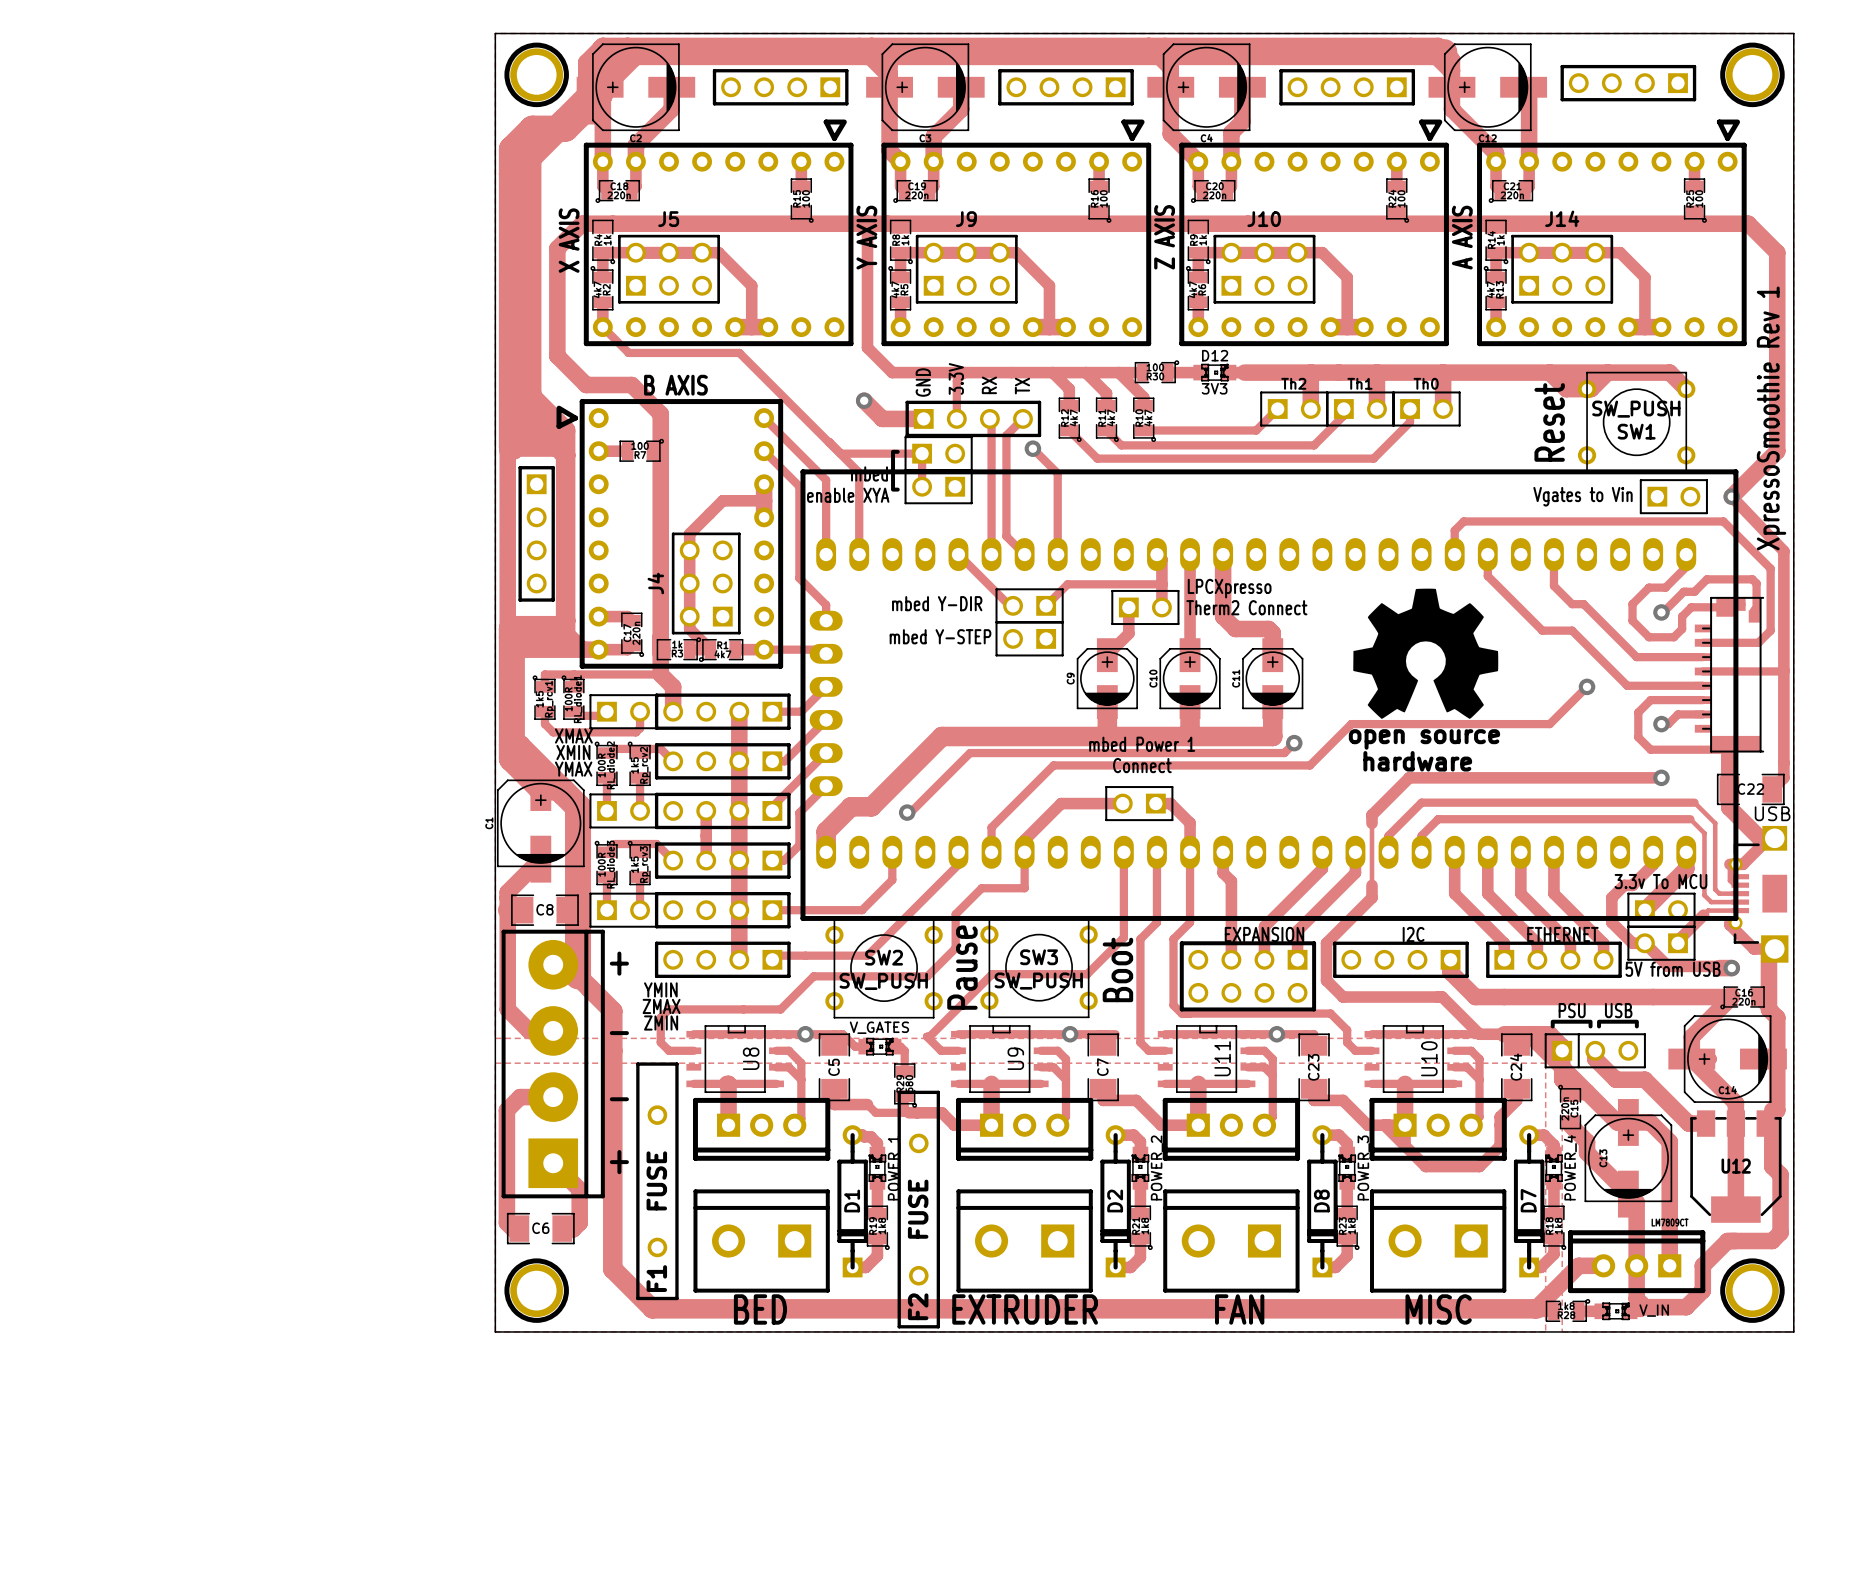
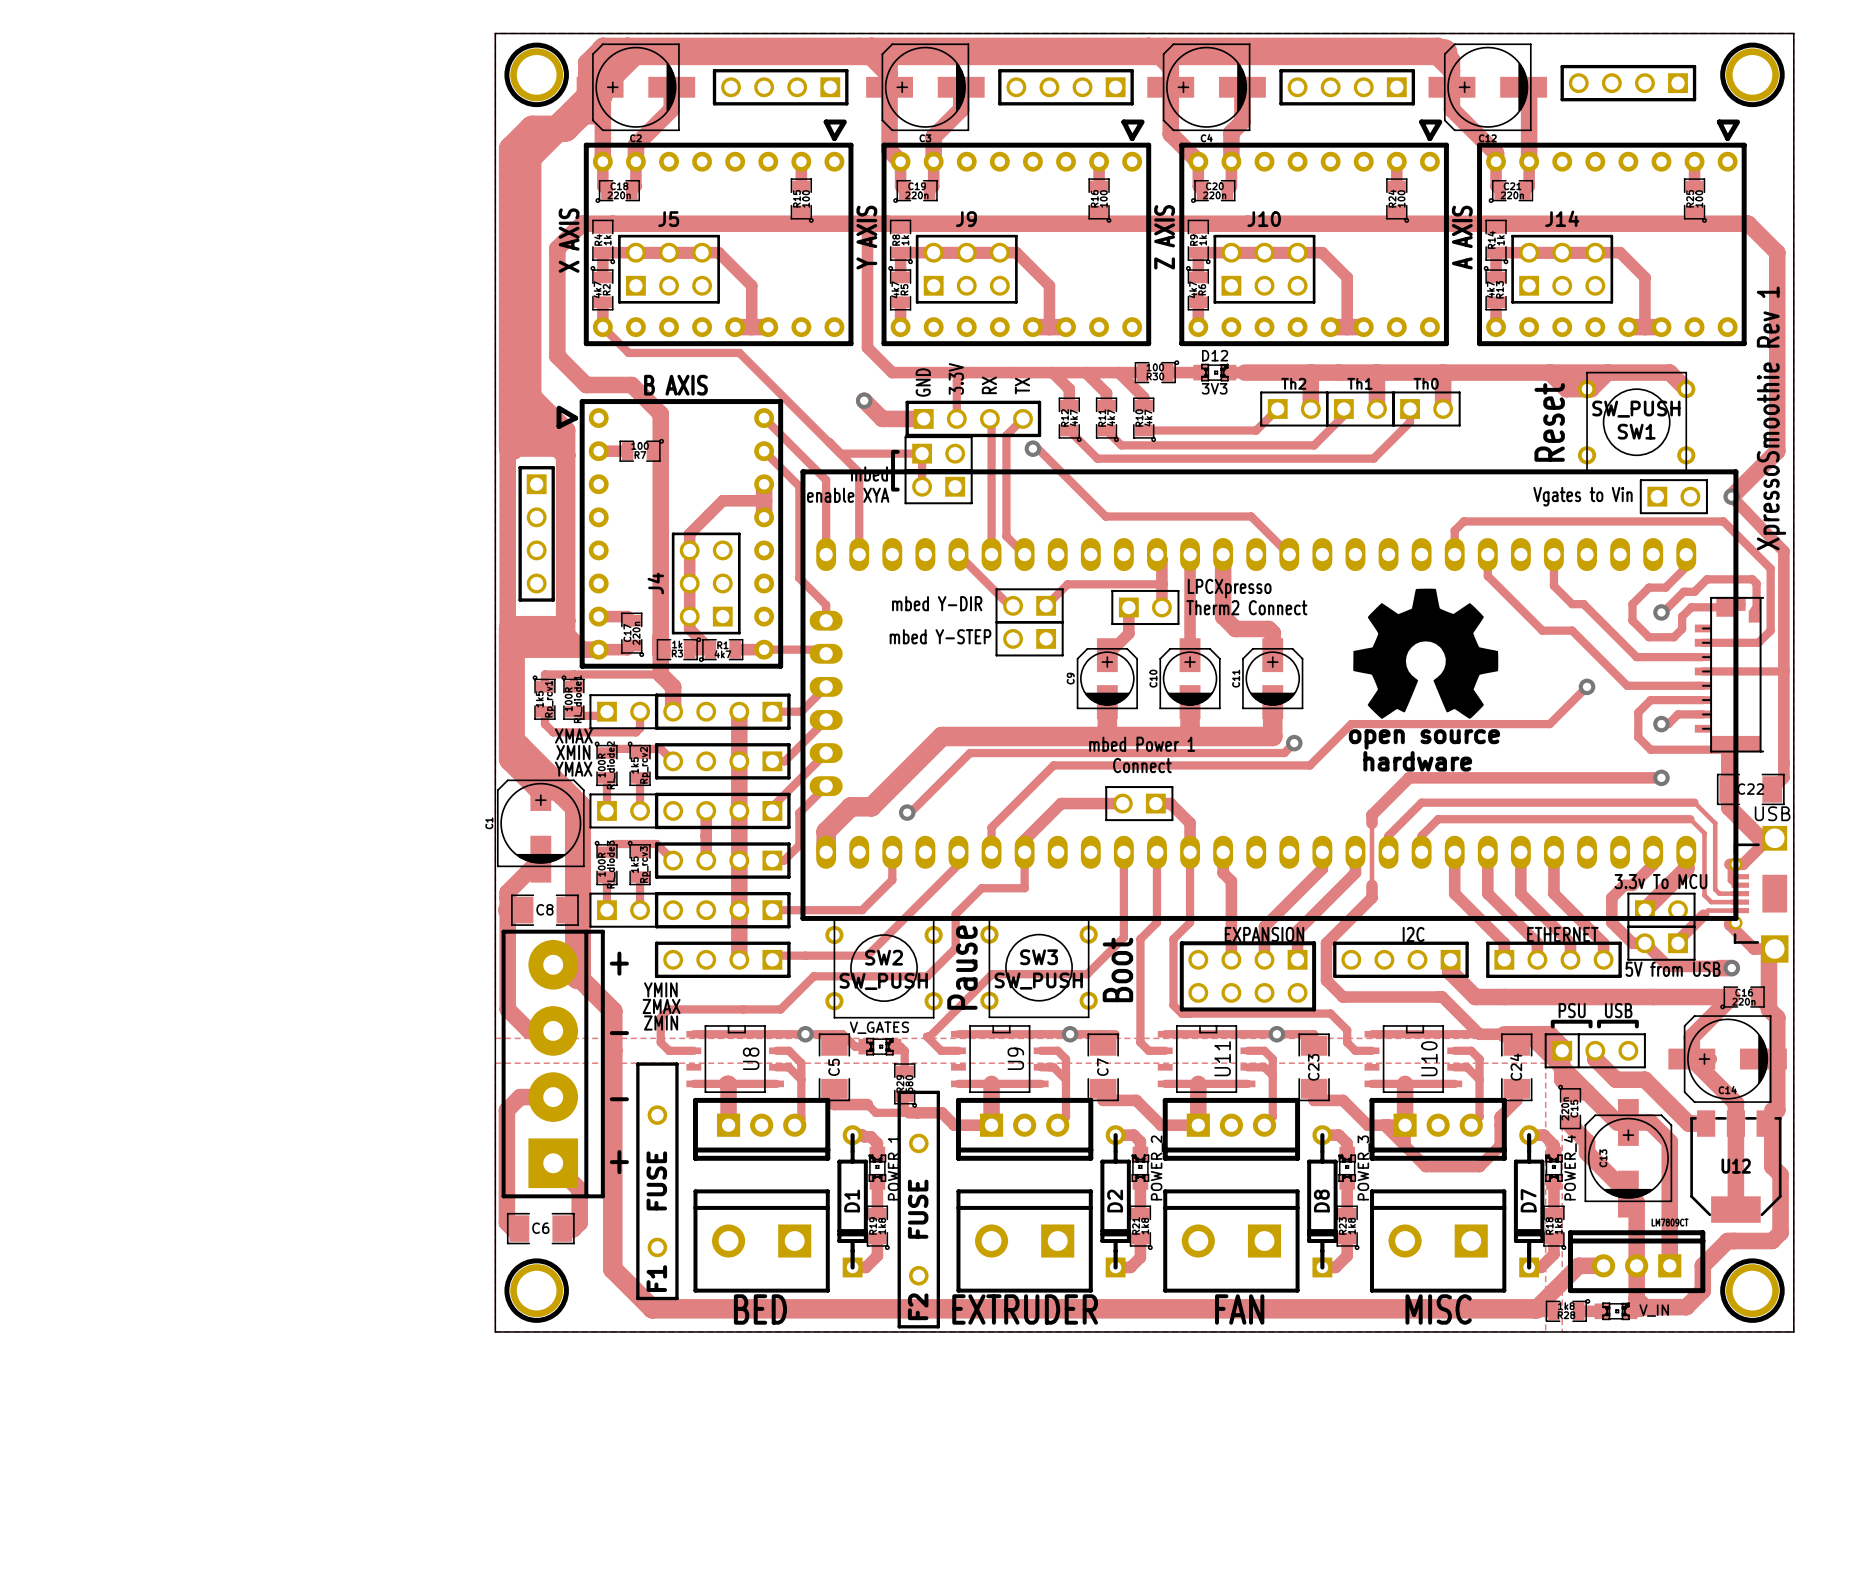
track: (1032, 448) (1057, 473) (1057, 554) -> none
track: none -> (1037, 448) (1105, 516) (1251, 516) (1289, 554)

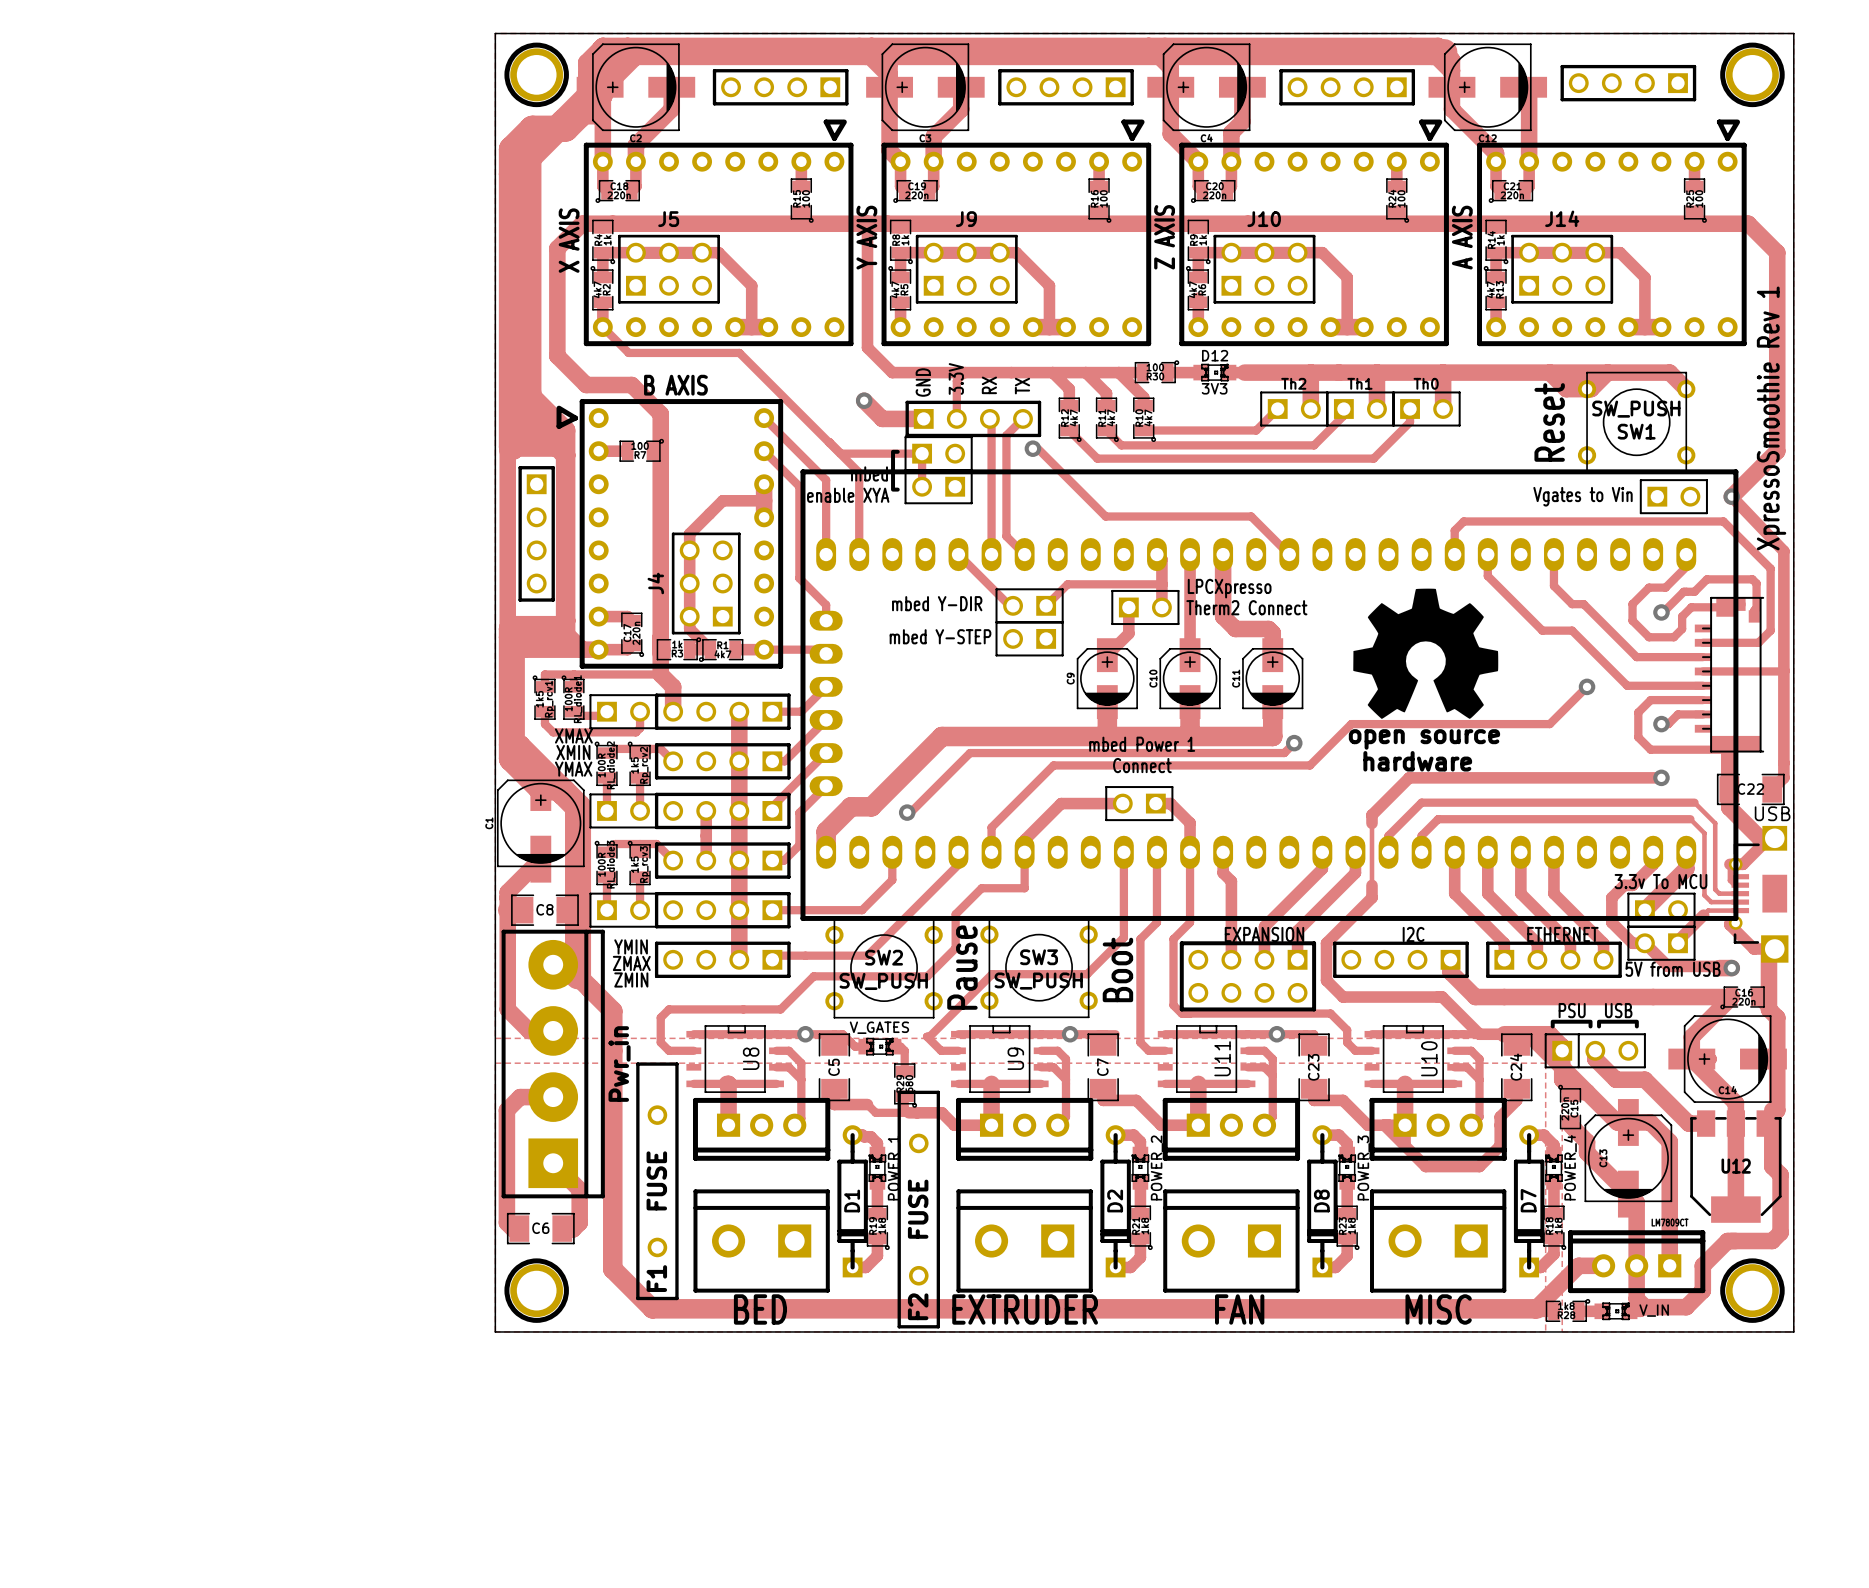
text: + (619, 963) -> none
text position: YMIN (660, 989) -> YMIN (631, 946)
text position: ZMAX (661, 1006) -> ZMAX (631, 963)
text position: ZMIN (661, 1023) -> ZMIN (631, 979)
text: - (619, 1033) -> none
part value: none -> Pwr_in (619, 1064)
text: - (619, 1099) -> none
text: + (619, 1162) -> none

